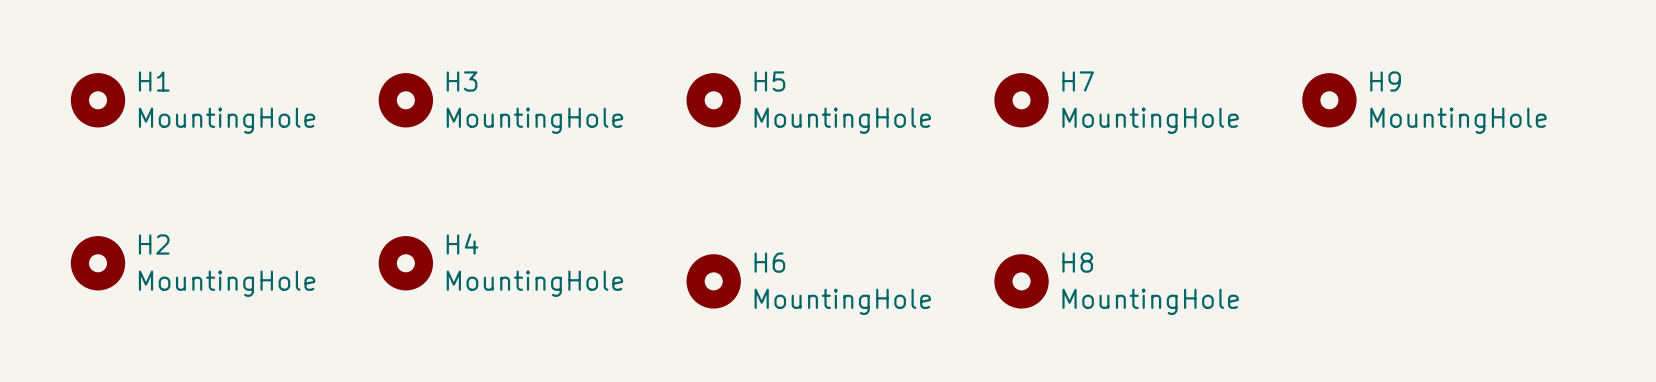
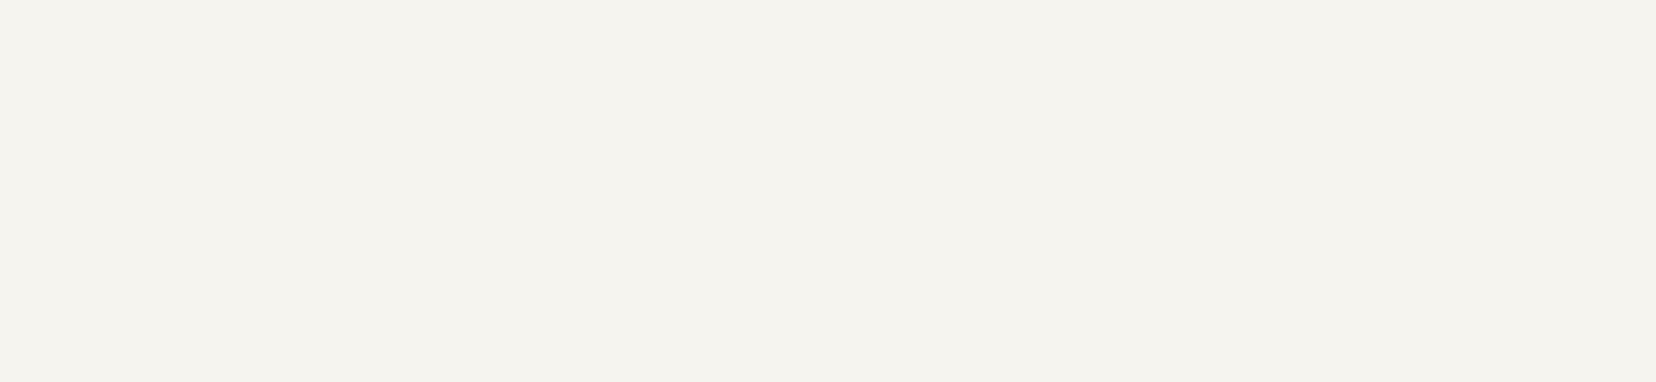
H1: MountingHole (98, 100) -> none
H3: MountingHole (405, 100) -> none
H5: MountingHole (713, 100) -> none
H7: MountingHole (1021, 100) -> none
H9: MountingHole (1329, 100) -> none
H2: MountingHole (98, 263) -> none
H4: MountingHole (405, 263) -> none
H6: MountingHole (713, 281) -> none
H8: MountingHole (1021, 281) -> none

